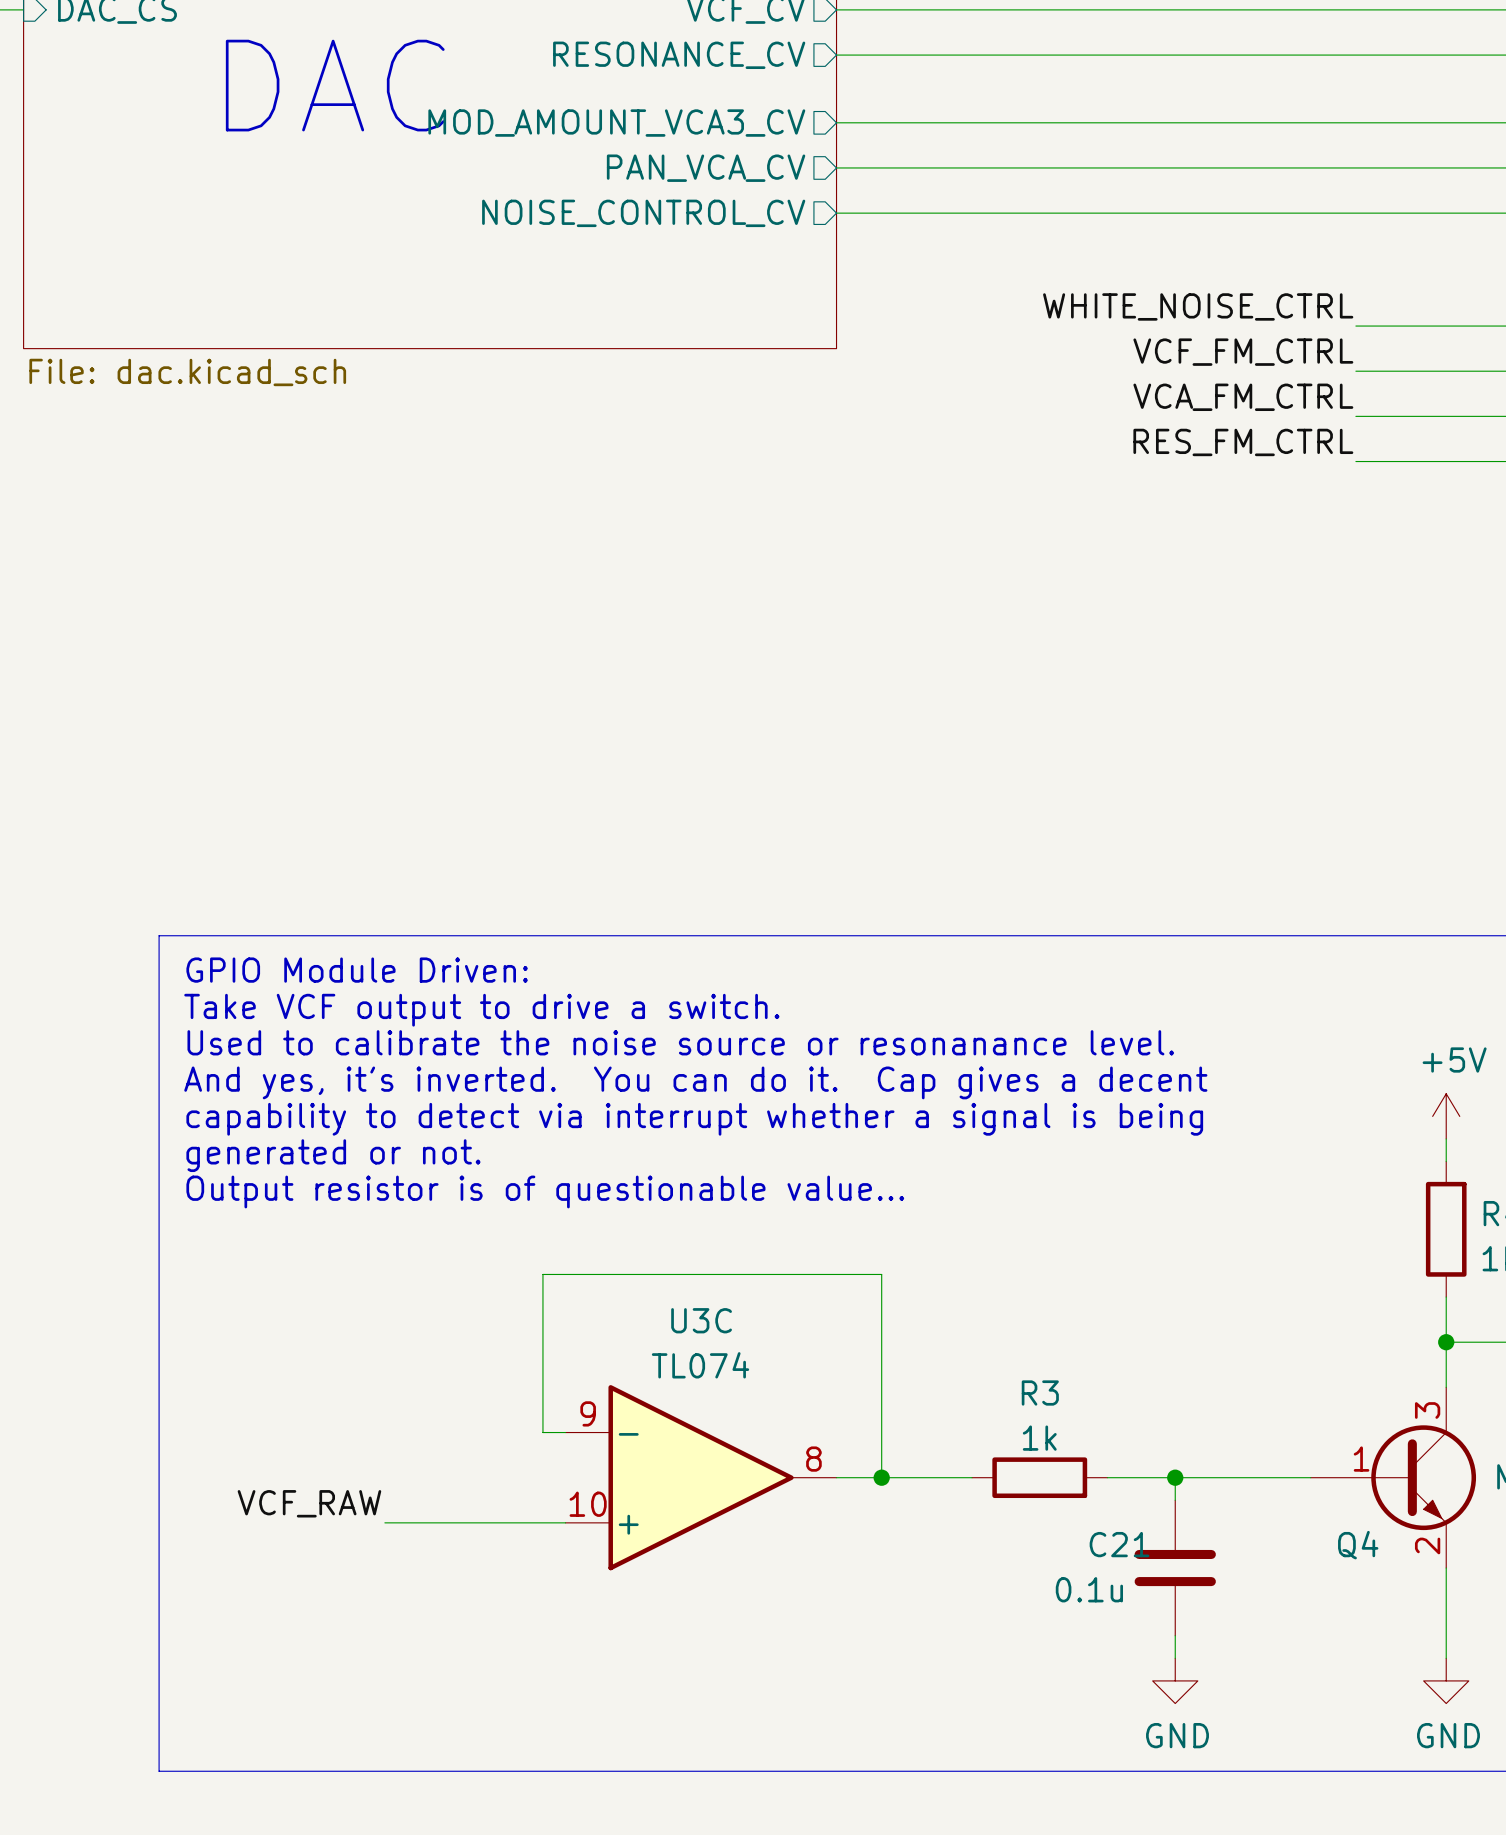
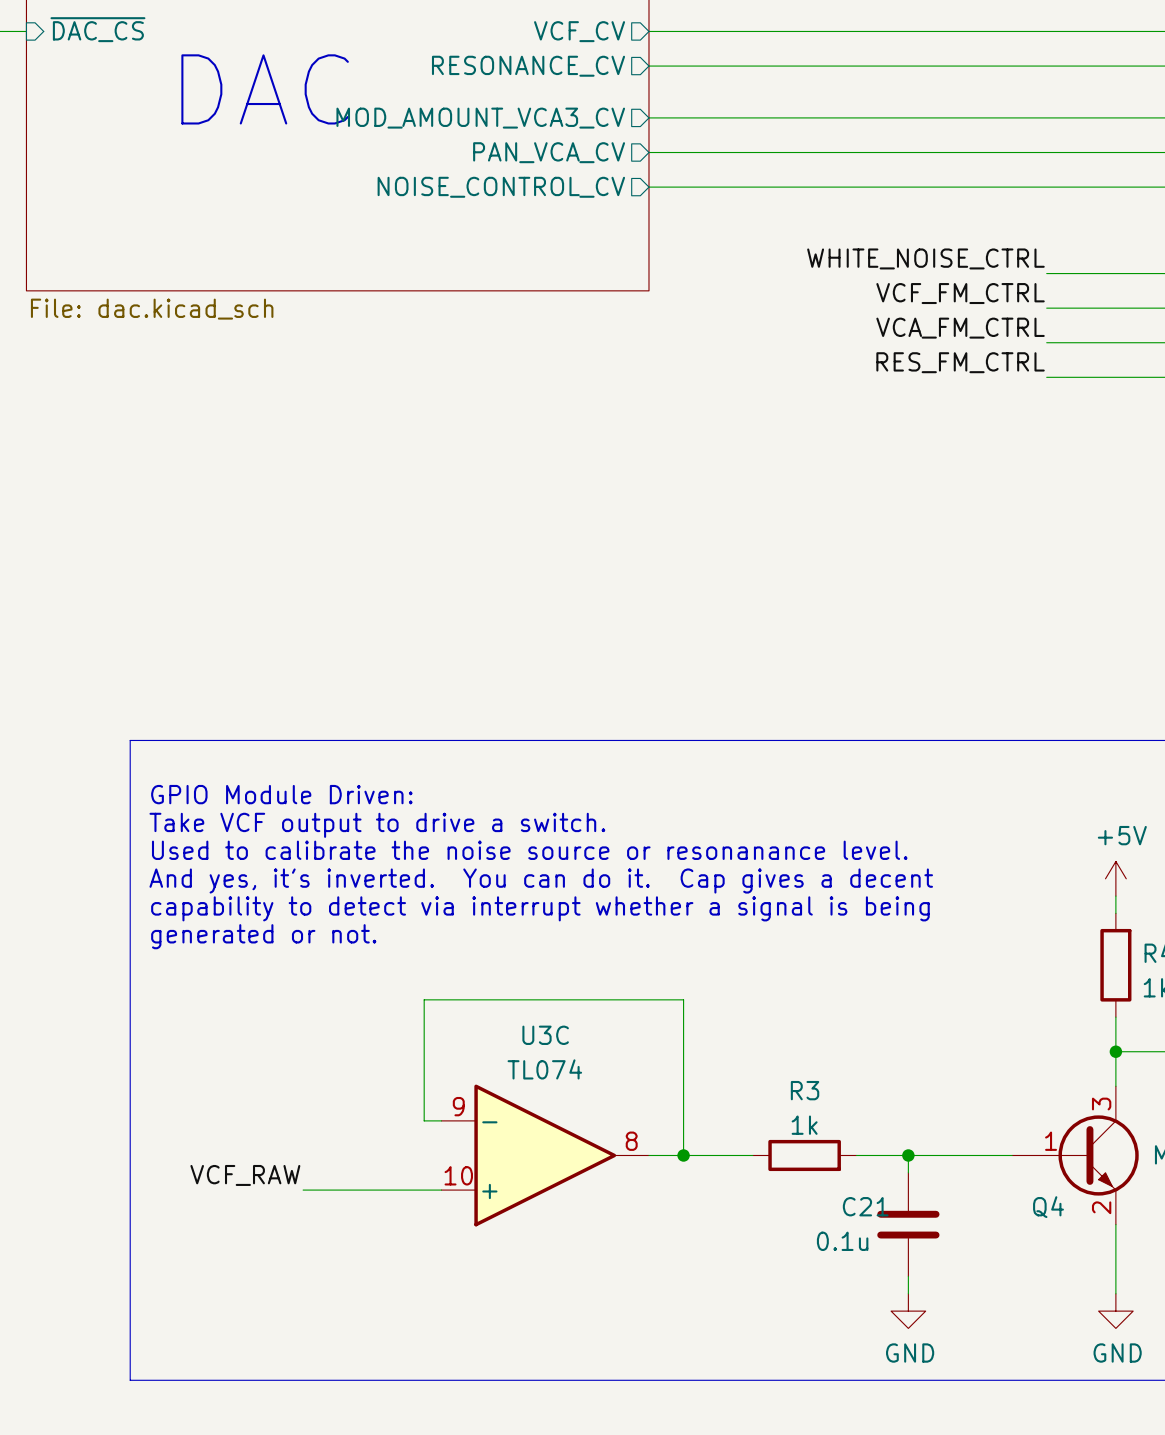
text: GPIO Module Driven: (357, 970) -> none
text: Take VCF output to drive a switch. (481, 1010) -> GPIO Module Driven: (281, 794)
text: Used to calibrate the noise source or resonanance level. (680, 1042) -> Take VCF output to drive a switch. (377, 825)
text: And yes, it's inverted. You can do it. Cap gives a decent (695, 1082) -> Used to calibrate the noise source or resonanance level. (529, 850)
text: capability to detect via interrupt whether a signal is being (694, 1119) -> And yes, it's inverted. You can do it. Cap gives a decent (541, 881)
text: generated or not. (333, 1155) -> capability to detect via interrupt whether a signal is being (540, 908)
text: Output resistor is of questionable value... (545, 1191) -> generated or not. (263, 936)

